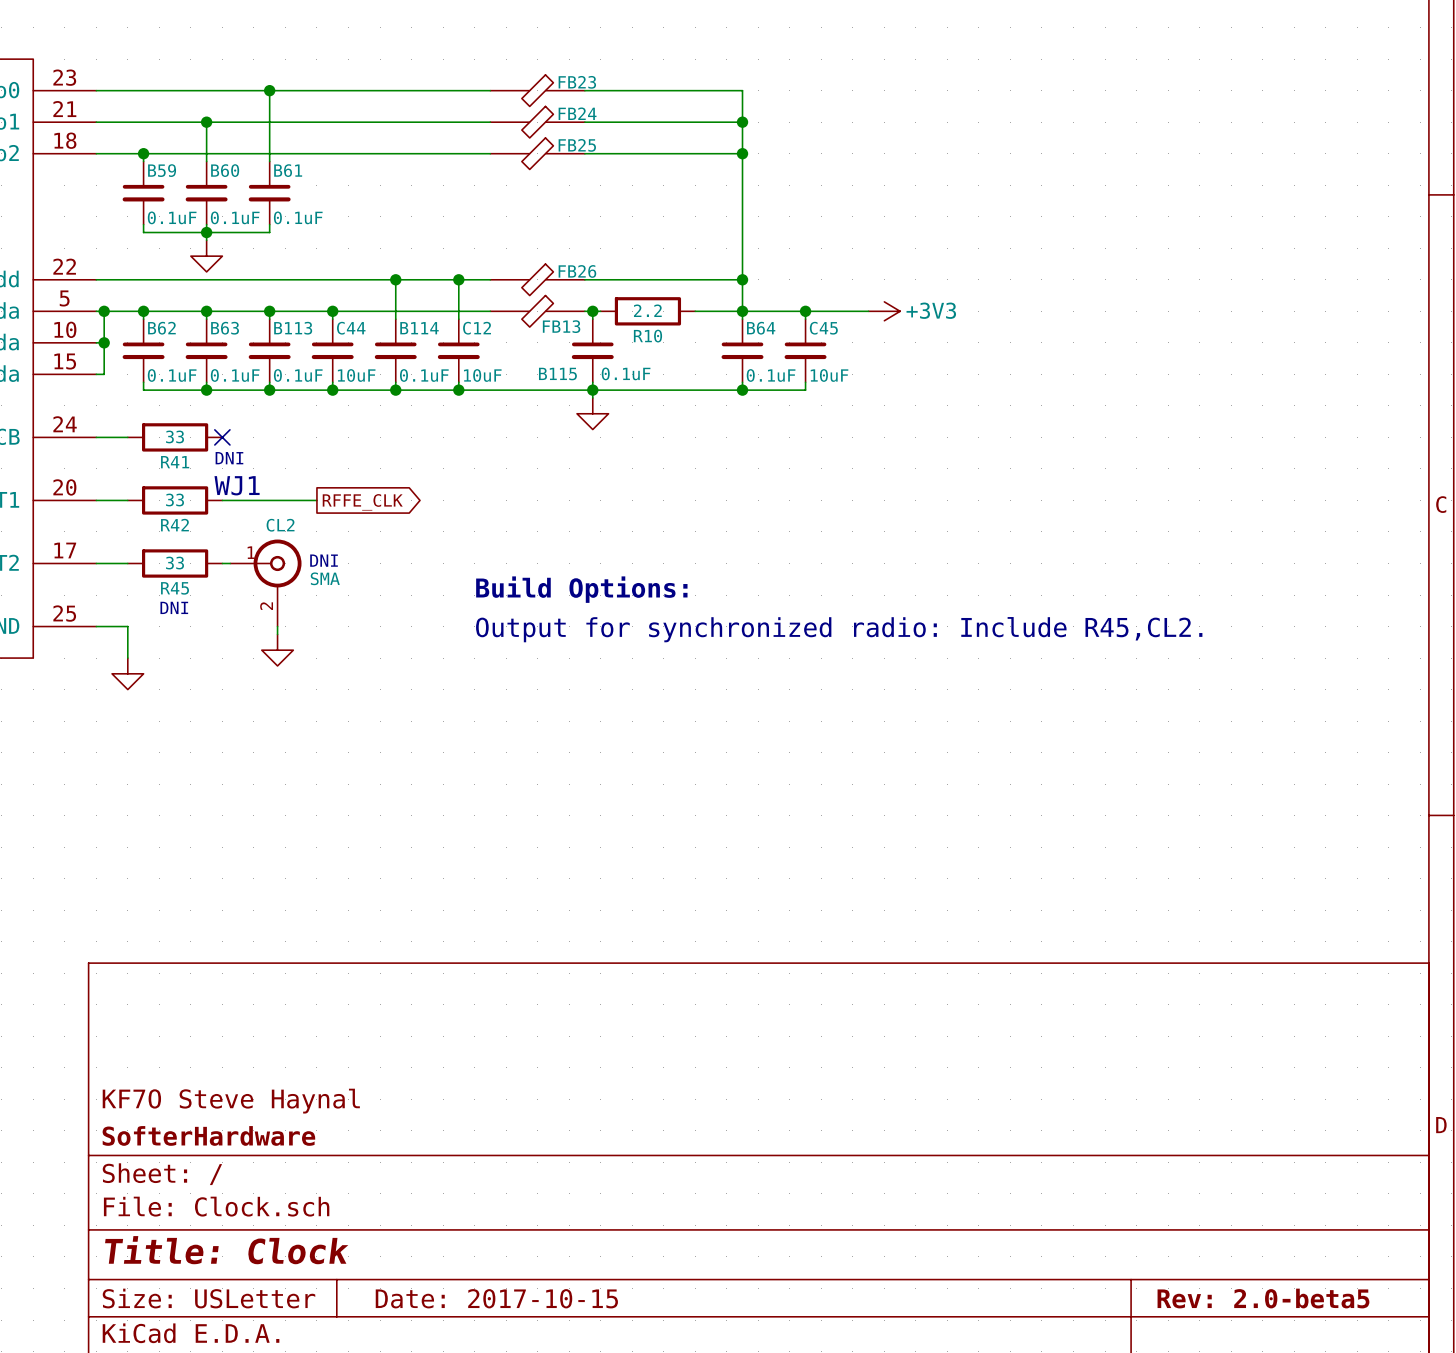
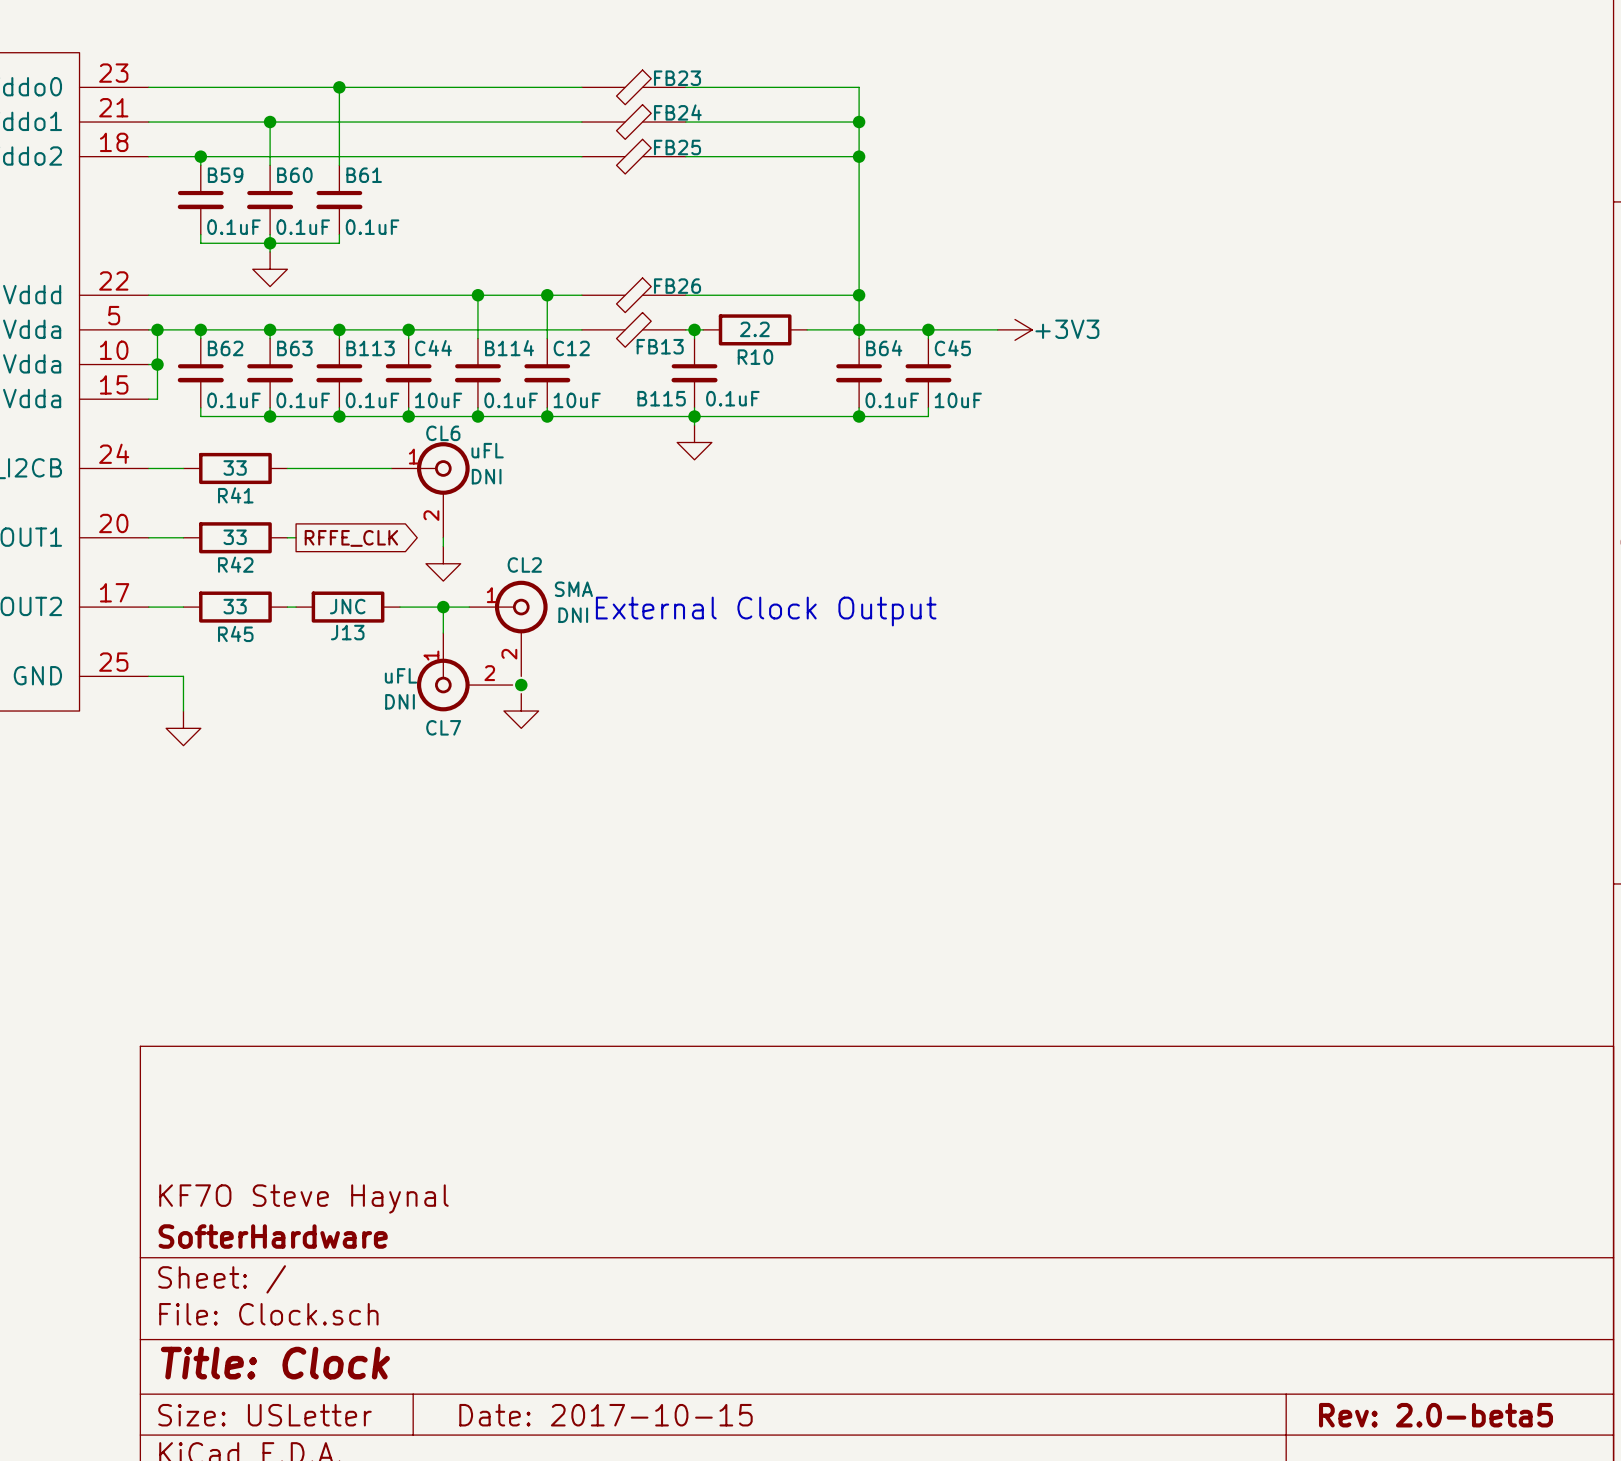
wire: none -> (287, 468) (391, 468)
no-connect mark: (222, 437) -> none
CL6: none -> uFL (430, 489)
text: DNI (229, 458) -> none
text: WJ1 (237, 485) -> none
wire: (230, 500) (316, 500) -> none
global label position: RFFE_CLK (362, 502) -> RFFE_CLK (351, 538)
power symbol: none -> (443, 563)
text: DNI (324, 560) -> none
J13: none -> JNC (348, 607)
wire: none -> (400, 607) (469, 607)
wire: none -> (443, 607) (443, 633)
junction: none -> (443, 607)
text: none -> External Clock Output (766, 611)
CL2 text: none -> DNI (573, 615)
CL2 value position: SMA (325, 578) -> SMA (573, 589)
CL2 position: (265, 583) -> (508, 628)
text: Build Options: (581, 589) -> none
text: DNI (174, 607) -> none
CL7: none -> uFL (464, 672)
wire: (277, 626) (277, 634) -> (443, 537) (443, 546)
text: Output for synchronized radio: Include R45,CL2. (839, 629) -> none
junction: none -> (521, 685)
power symbol: (277, 650) -> none
power symbol: none -> (521, 711)

